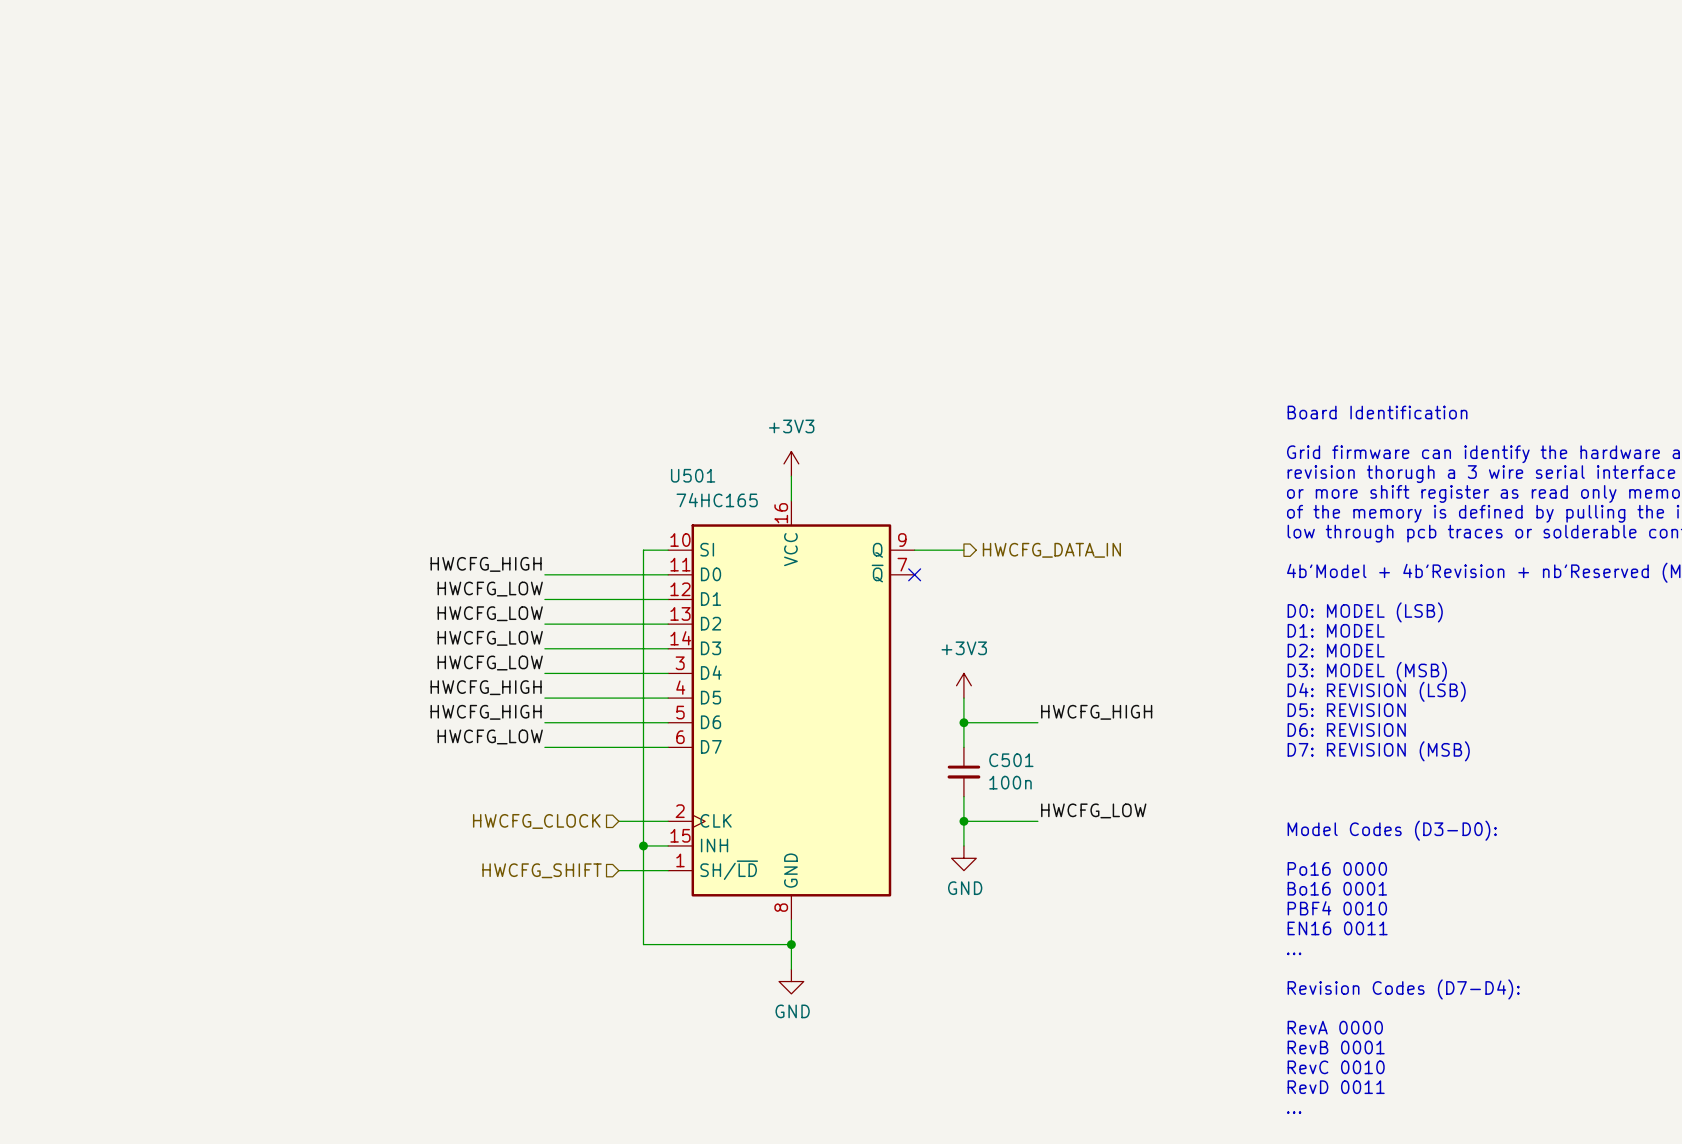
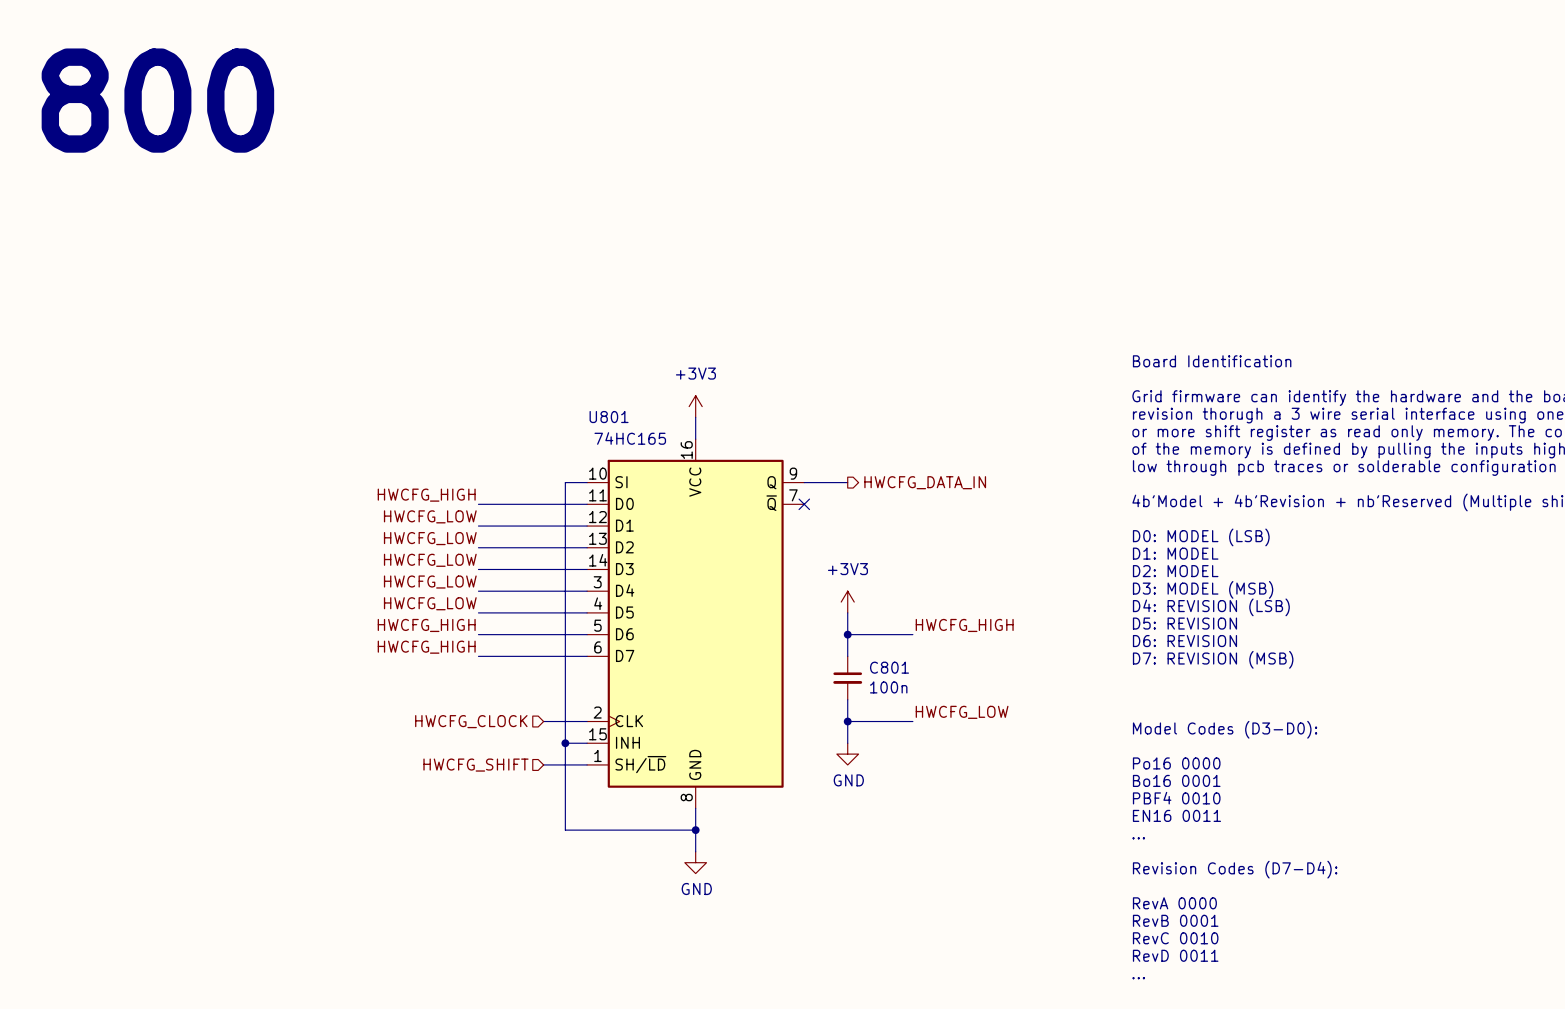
text: none -> 800 (157, 100)
U501 name: U501 (693, 475) -> U801 (609, 417)
label: HWCFG_HIGH (486, 687) -> HWCFG_LOW (430, 603)
label: HWCFG_LOW (490, 736) -> HWCFG_HIGH (426, 647)
C501 name: C501 (1011, 760) -> C801 (889, 667)

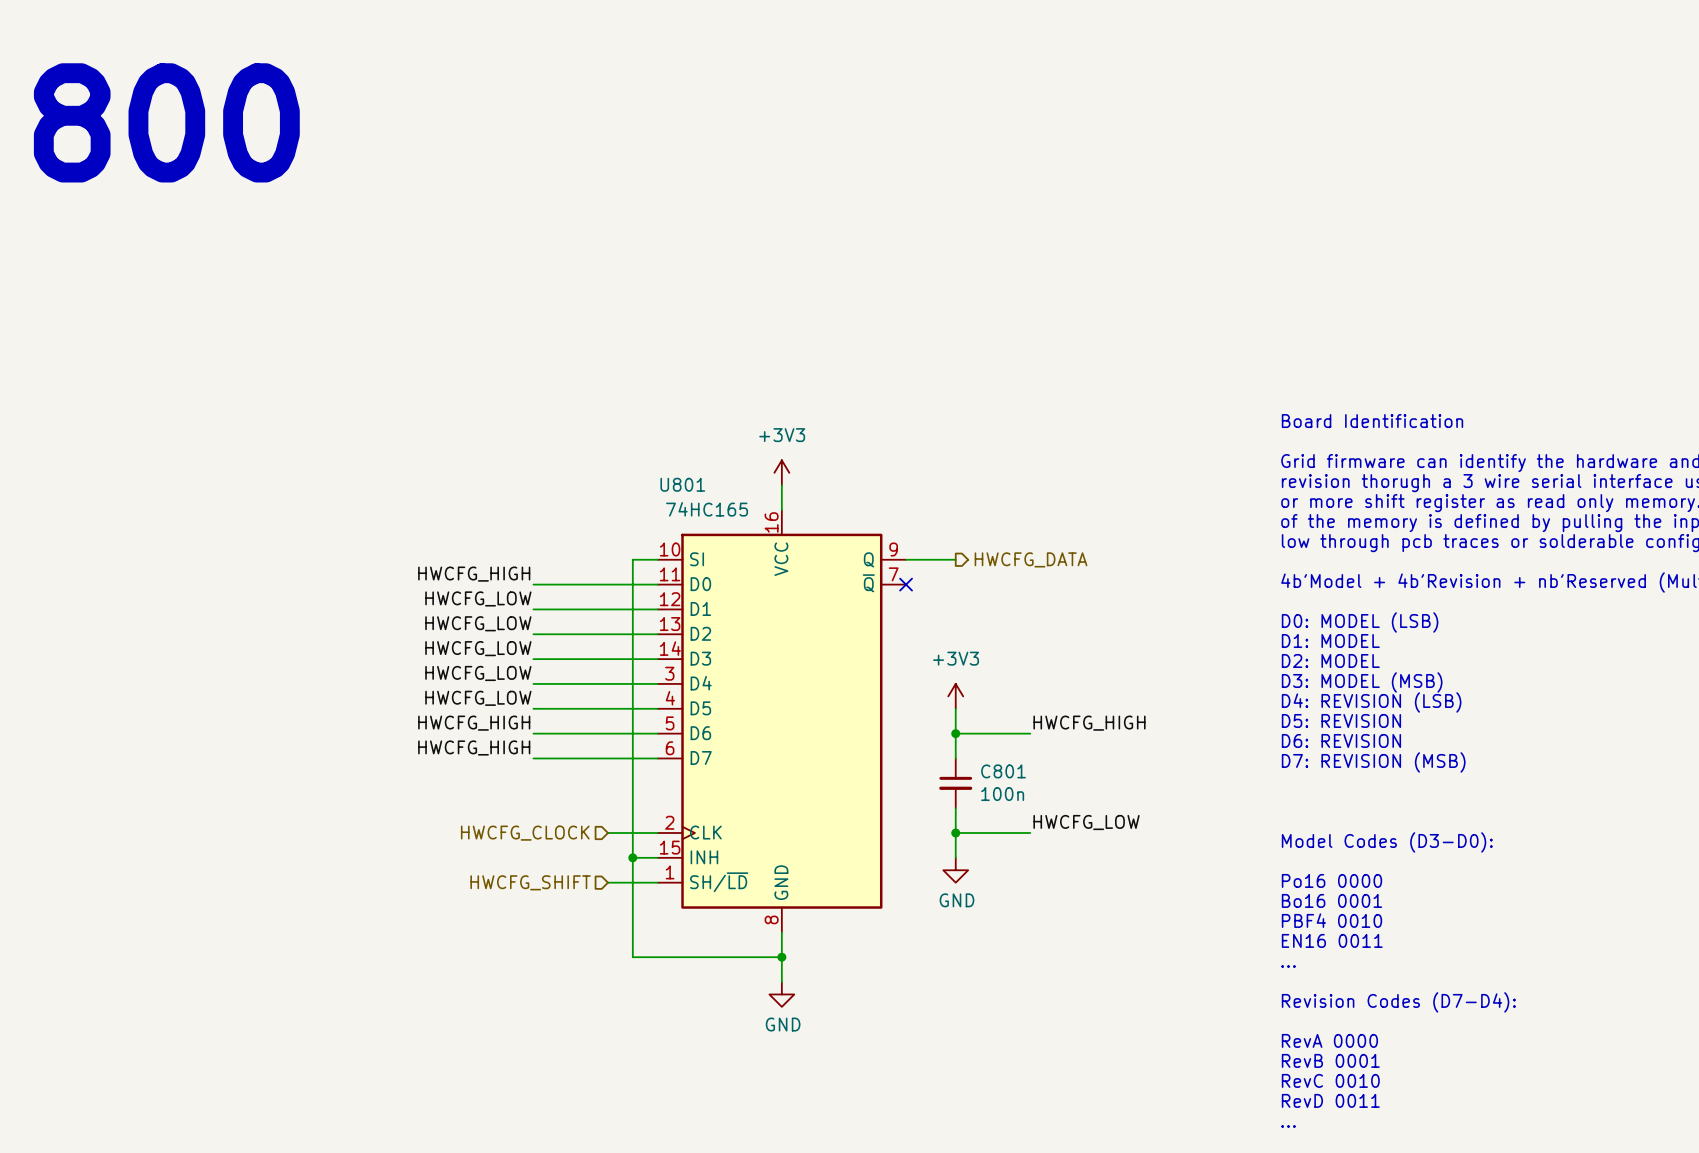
hierarchical label: HWCFG_DATA_IN (925, 482) -> HWCFG_DATA (1031, 559)

